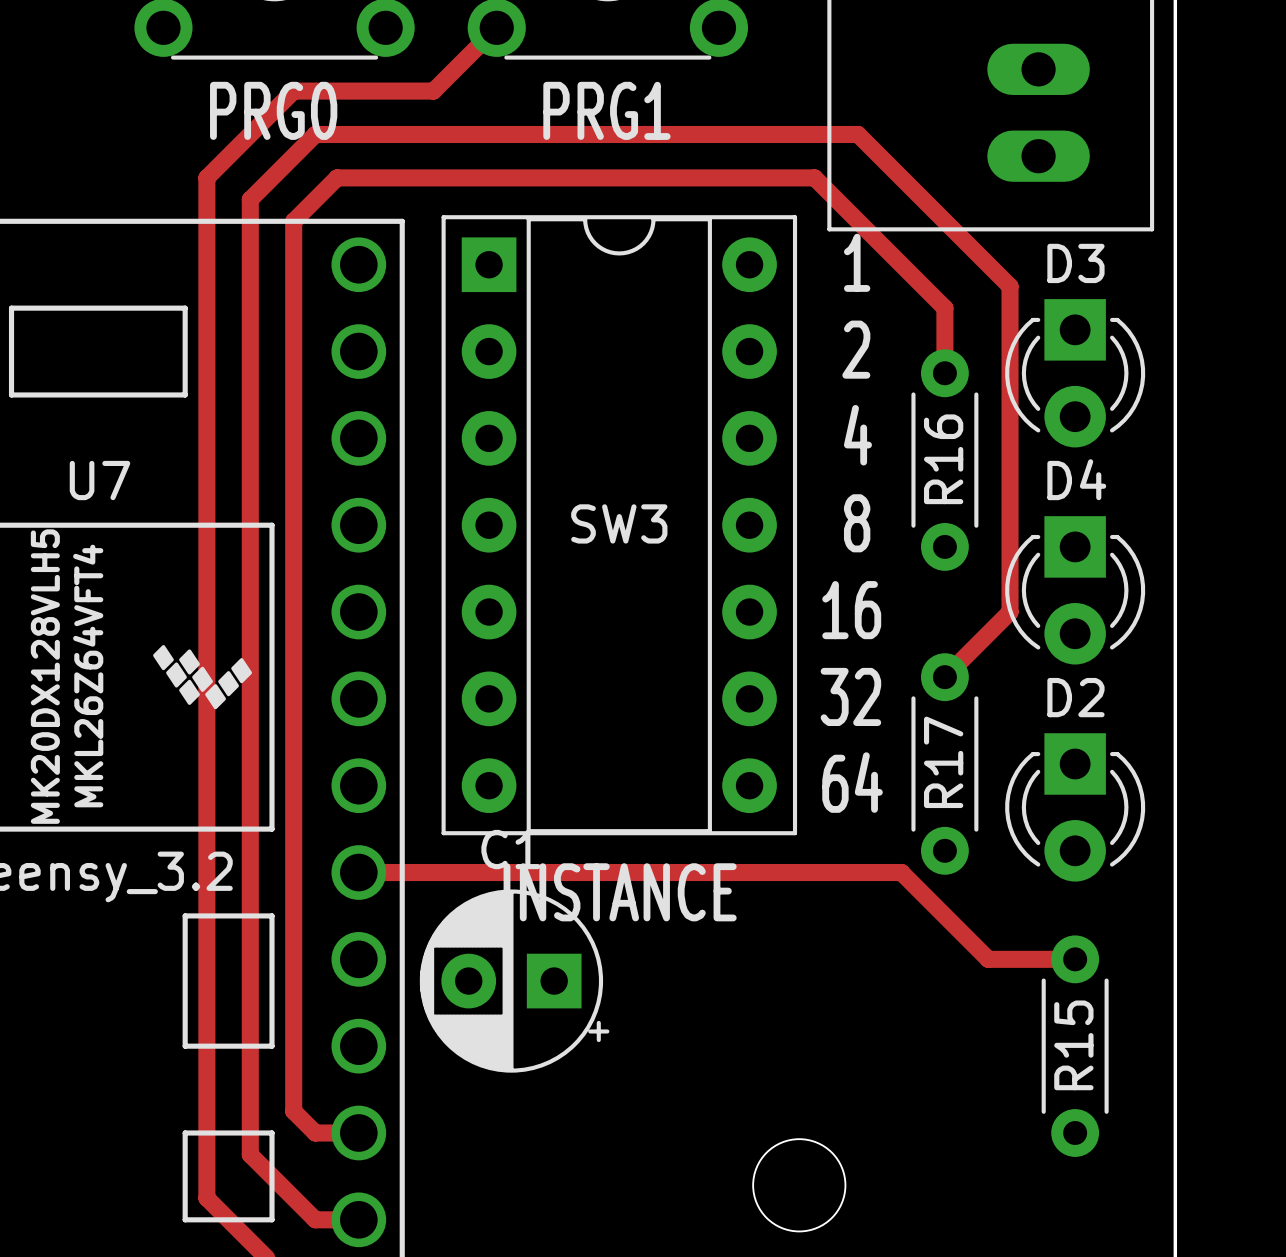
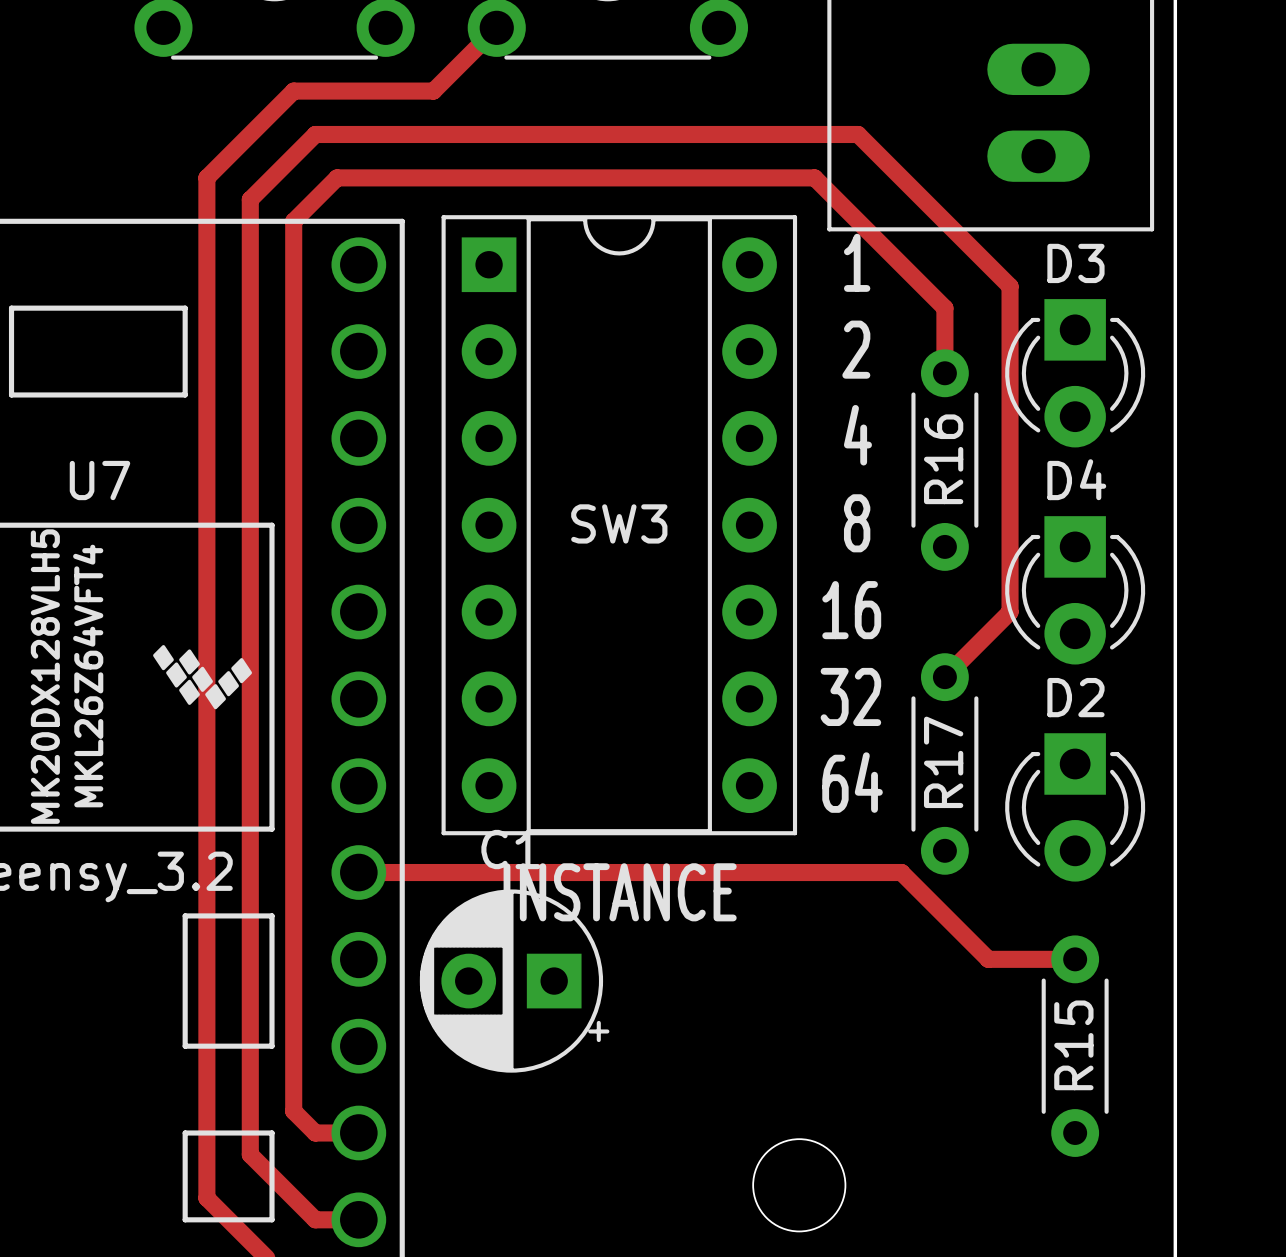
part value: PRG0 (273, 110) -> none
part value: PRG1 (606, 110) -> none

